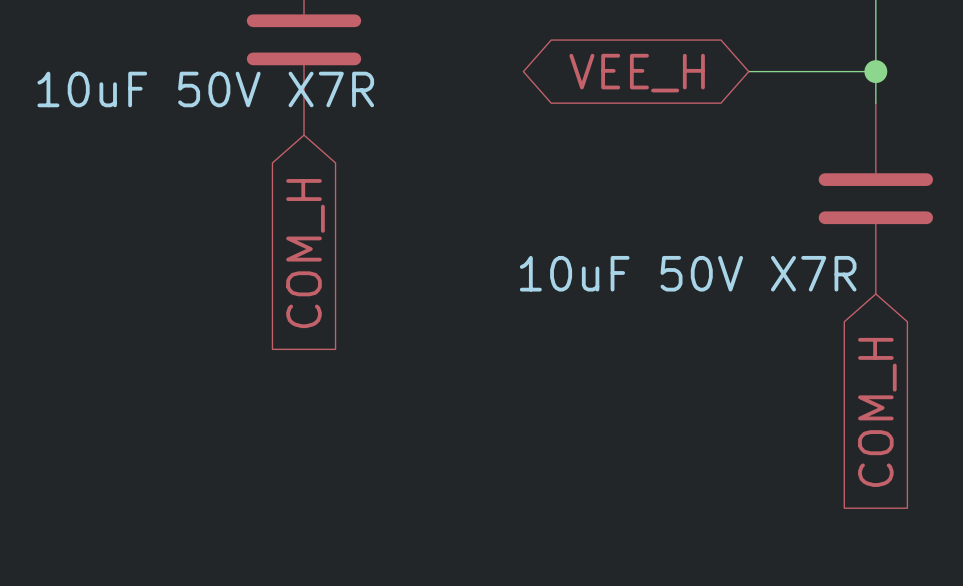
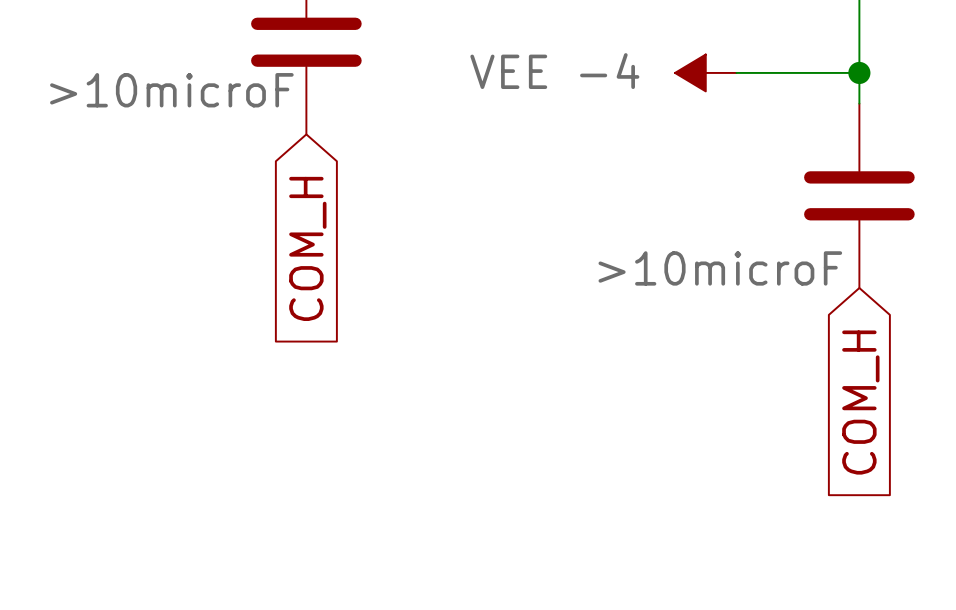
power symbol: none -> VEE -4 (705, 72)
global label: VEE_H (637, 73) -> none
part value: 10uF 50V X7R (205, 89) -> >10microF (171, 90)
part value: 10uF 50V X7R (688, 273) -> >10microF (720, 268)

